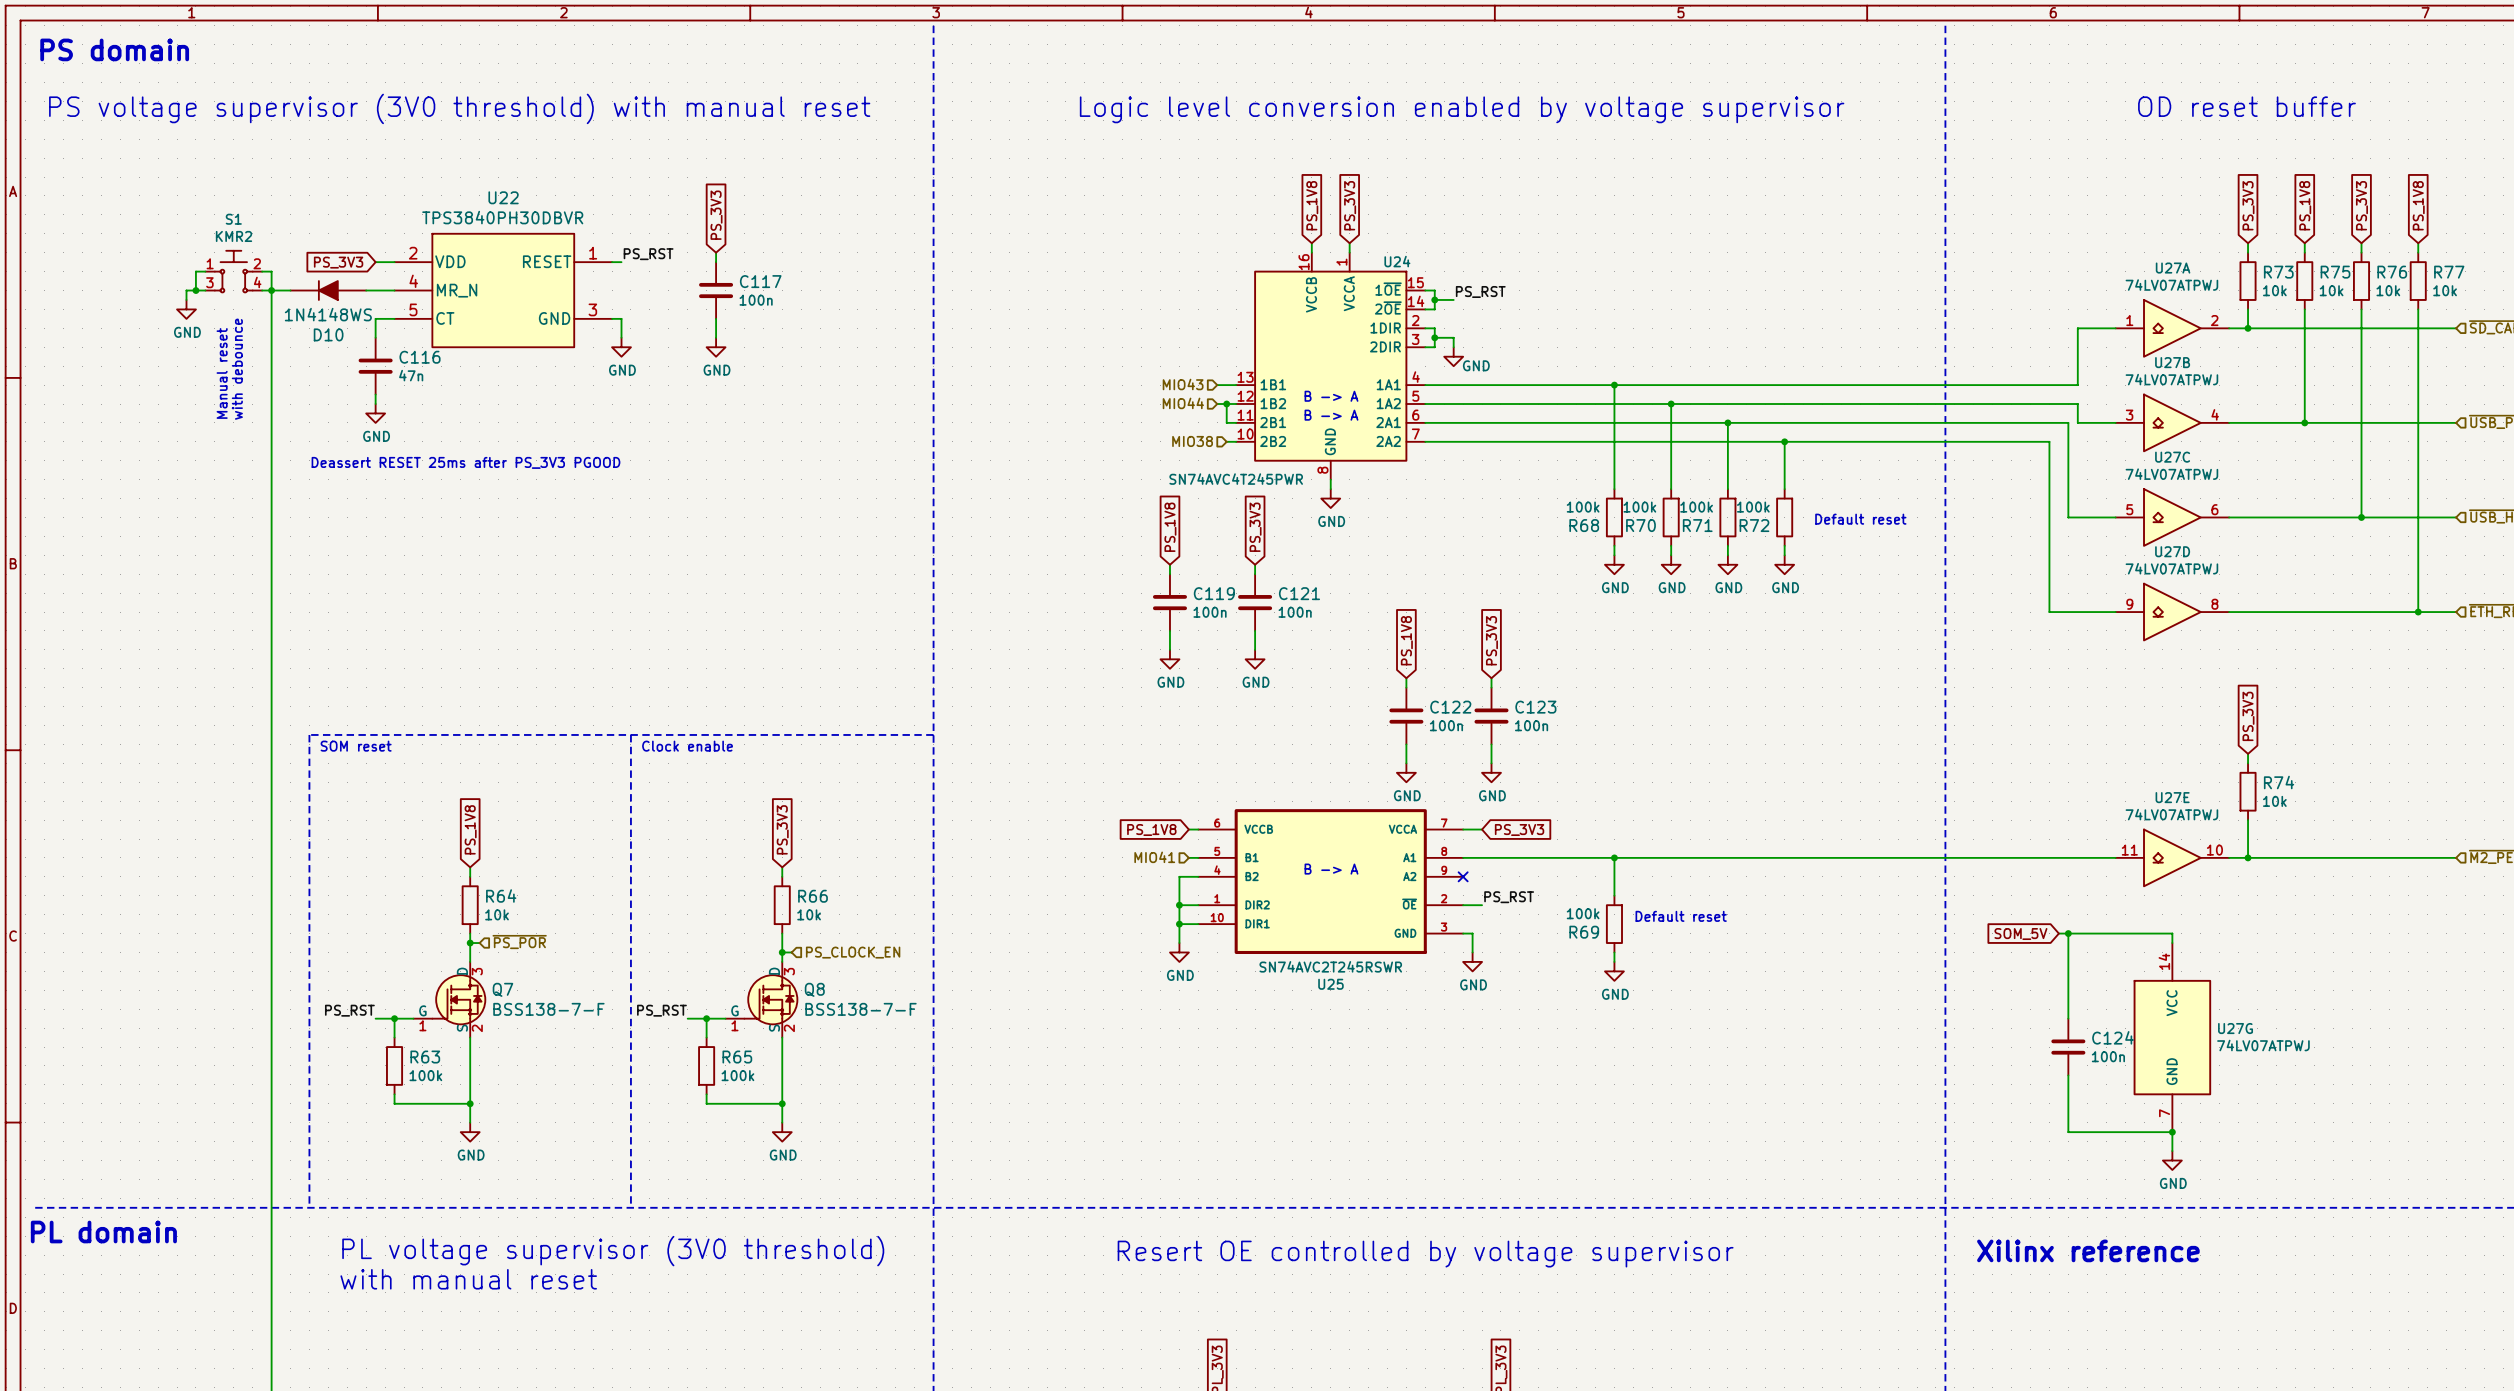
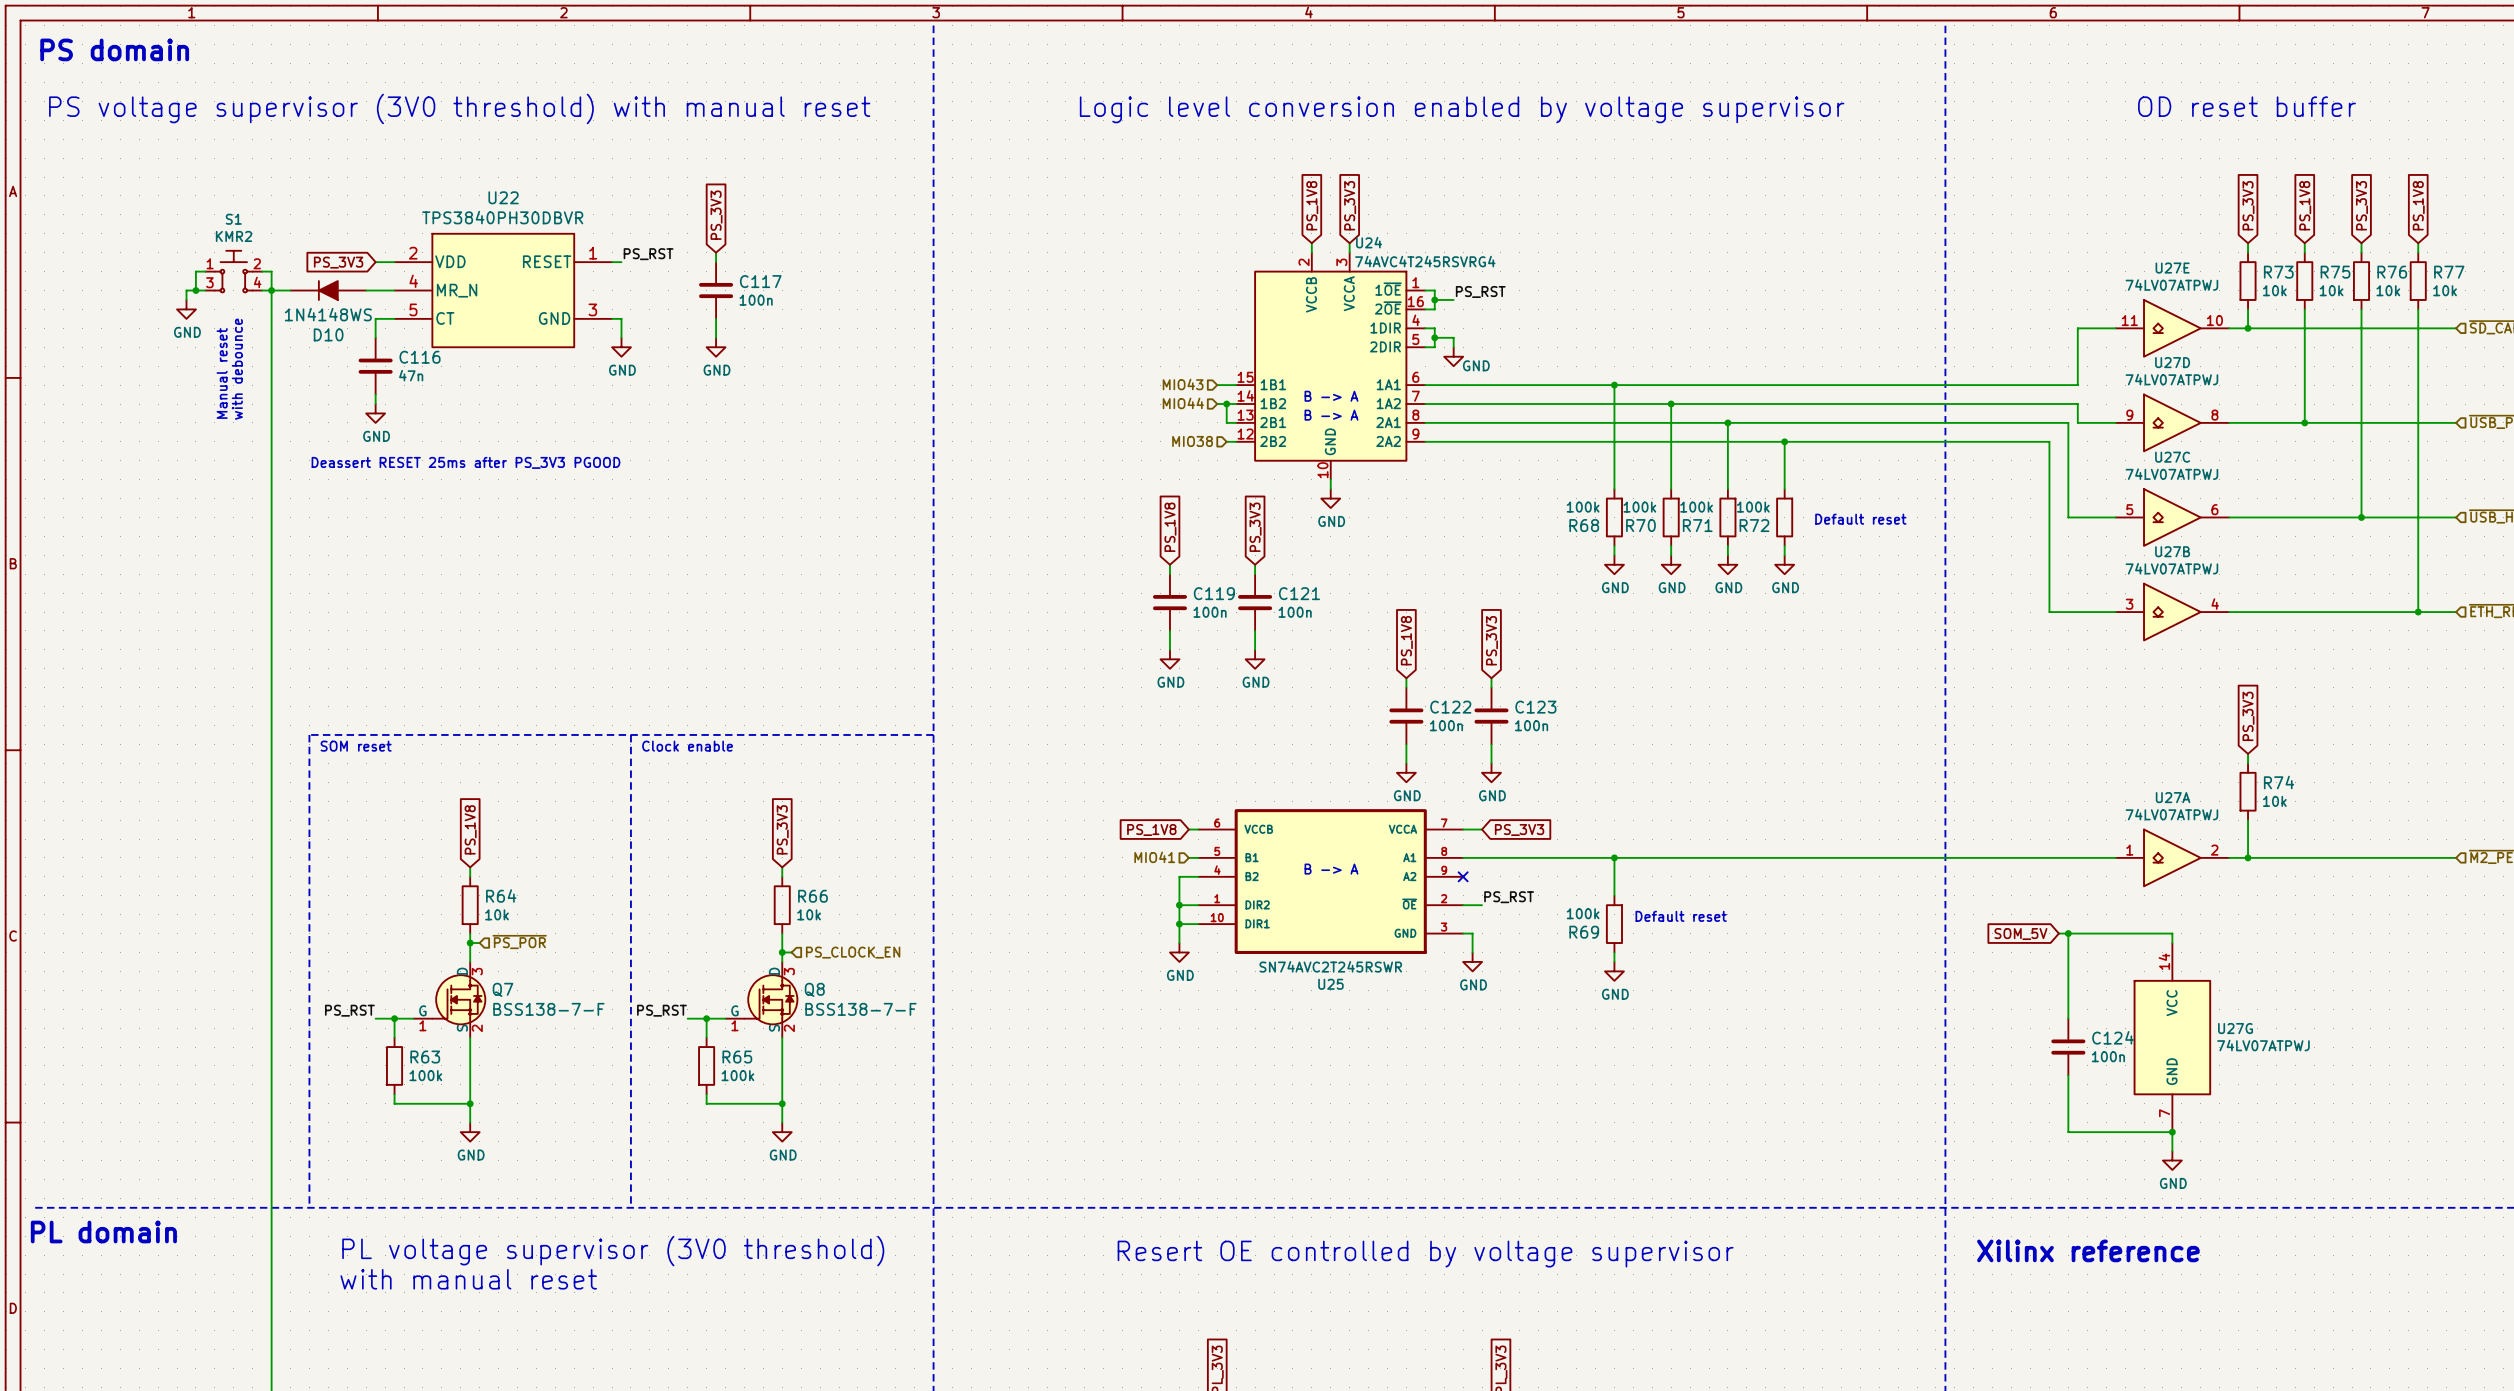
U24 symbol: [1236, 252, 1426, 480] -> [1236, 252, 1426, 480]
U24 name position: U24 (1397, 261) -> U24 (1369, 242)
U27A position: (2172, 328) -> (2172, 857)
U27B position: (2172, 422) -> (2172, 612)
U24 value: SN74AVC4T245PWR (1236, 479) -> 74AVC4T245RSVRG4 (1425, 261)
U27D position: (2172, 612) -> (2172, 422)
U27E position: (2172, 857) -> (2172, 328)

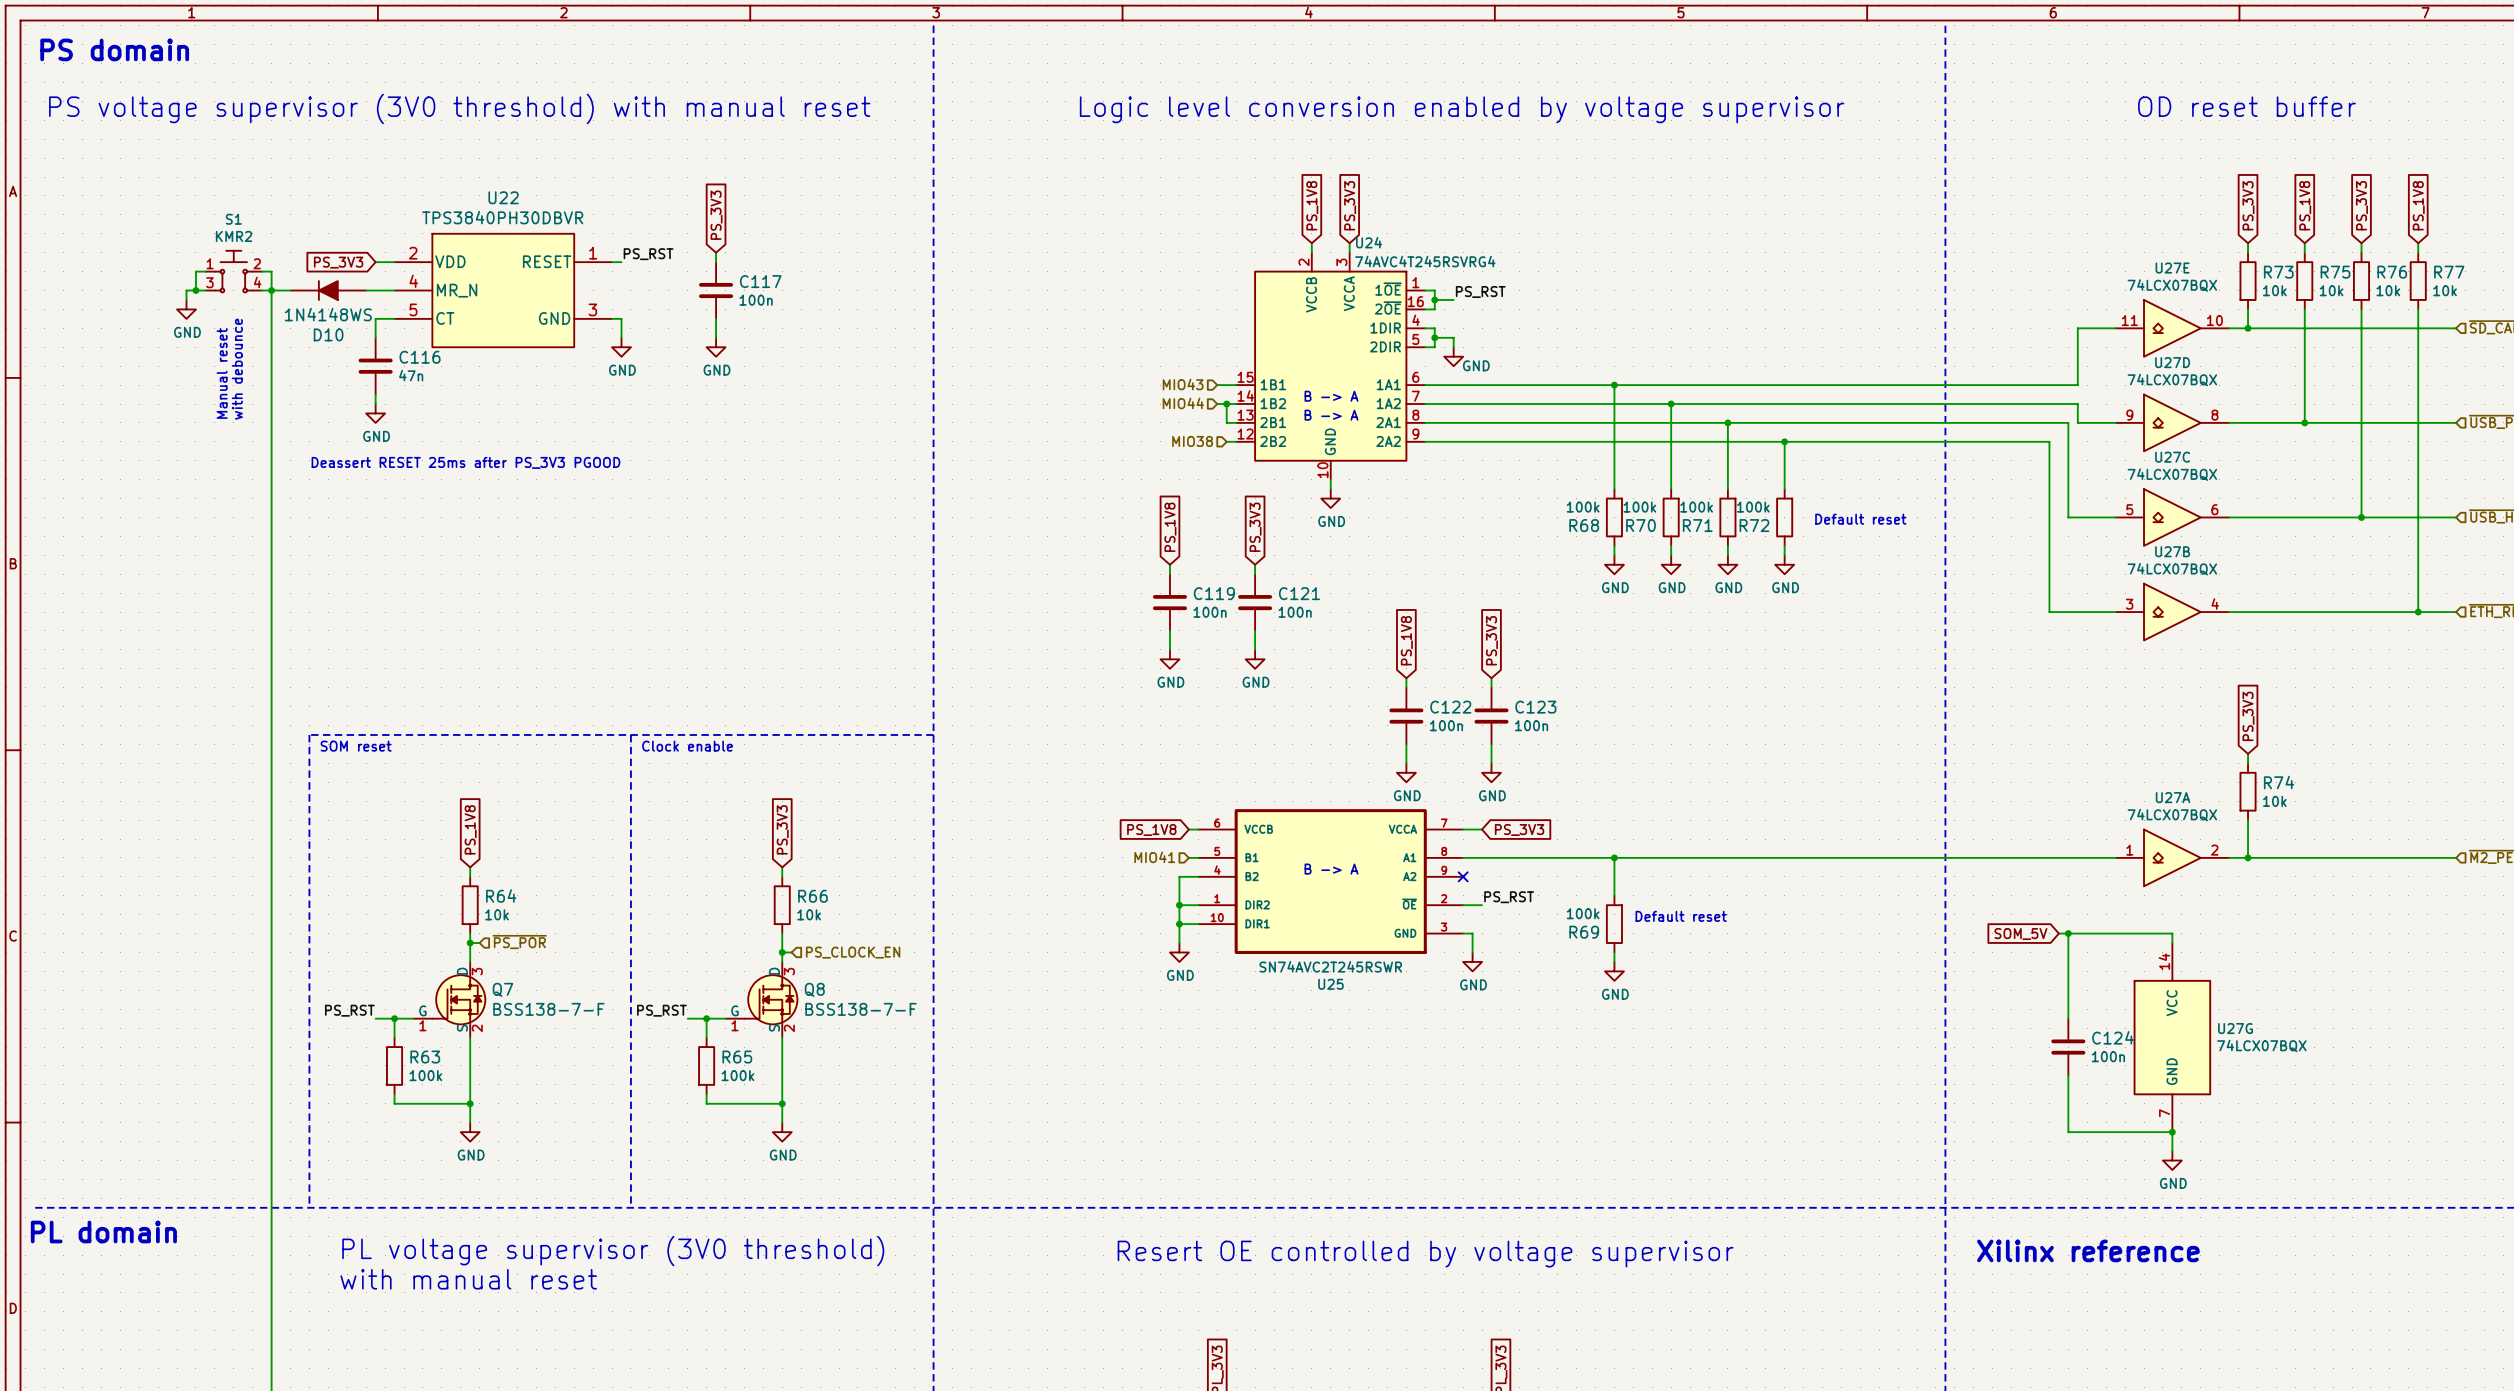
U27E value: 74LV07ATPWJ (2171, 285) -> 74LCX07BQX (2172, 285)
U27D value: 74LV07ATPWJ (2171, 379) -> 74LCX07BQX (2172, 380)
U27C value: 74LV07ATPWJ (2171, 474) -> 74LCX07BQX (2172, 474)
U27B value: 74LV07ATPWJ (2171, 568) -> 74LCX07BQX (2172, 569)
U27A value: 74LV07ATPWJ (2171, 814) -> 74LCX07BQX (2172, 815)
U27G value: 74LV07ATPWJ (2263, 1045) -> 74LCX07BQX (2261, 1045)

